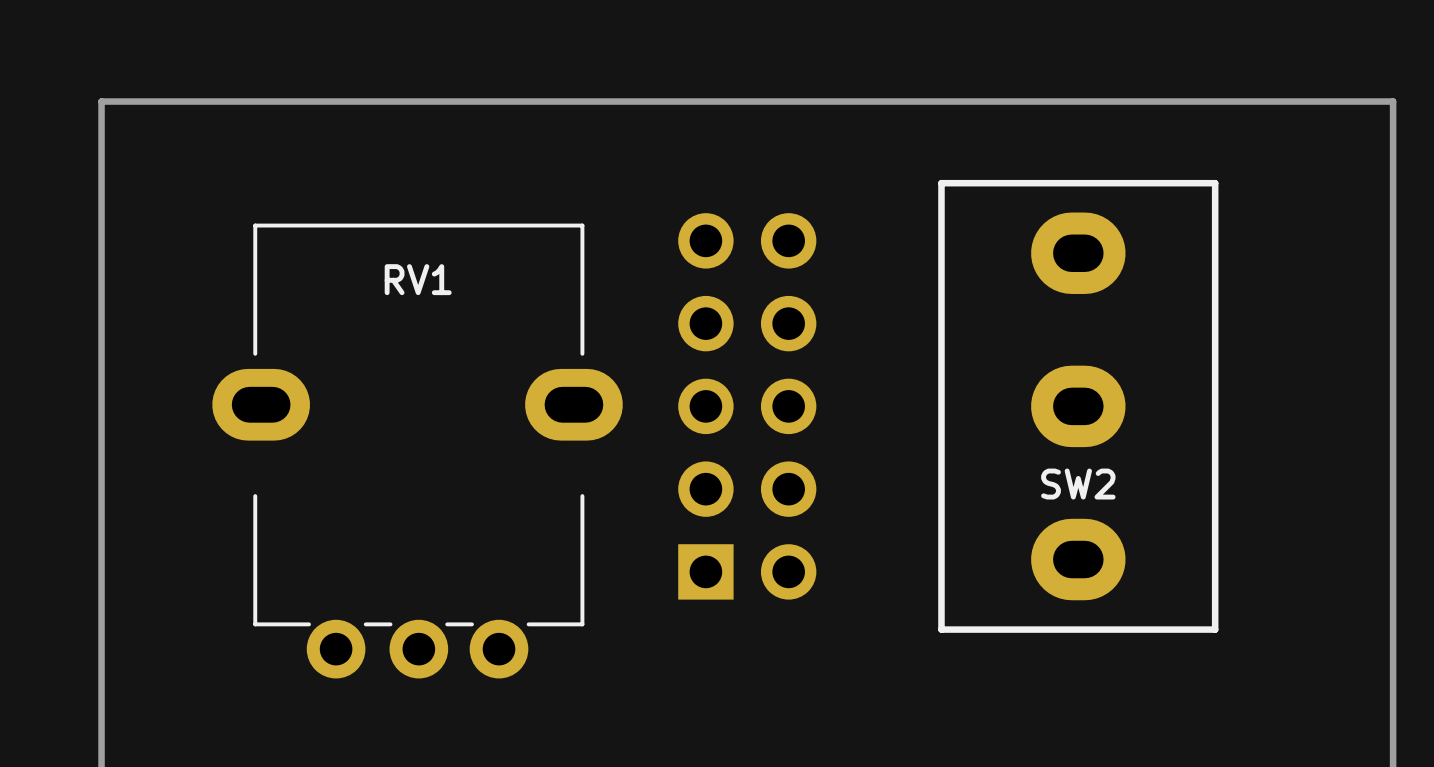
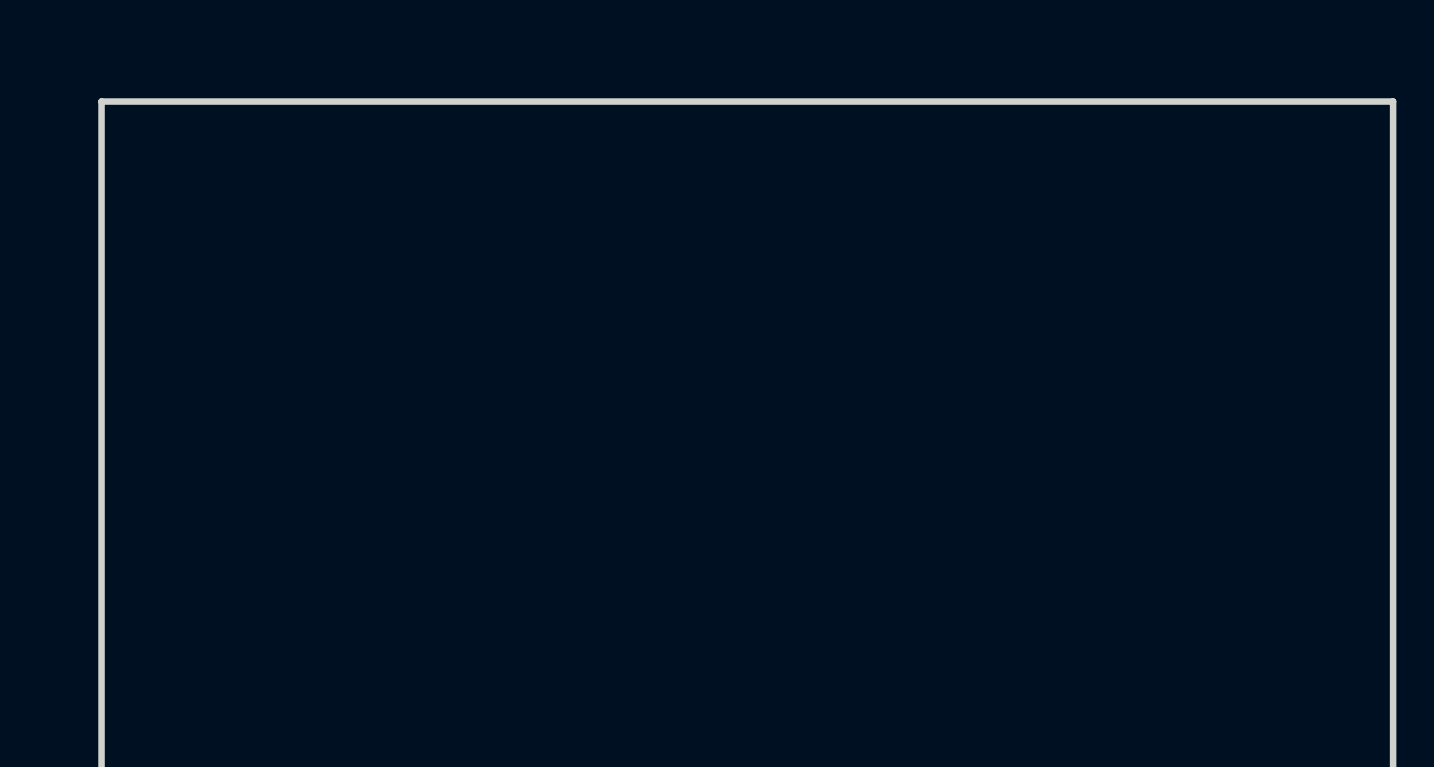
part: (747, 406) -> none
SW2: (1078, 406) -> none
RV1: (417, 451) -> none

